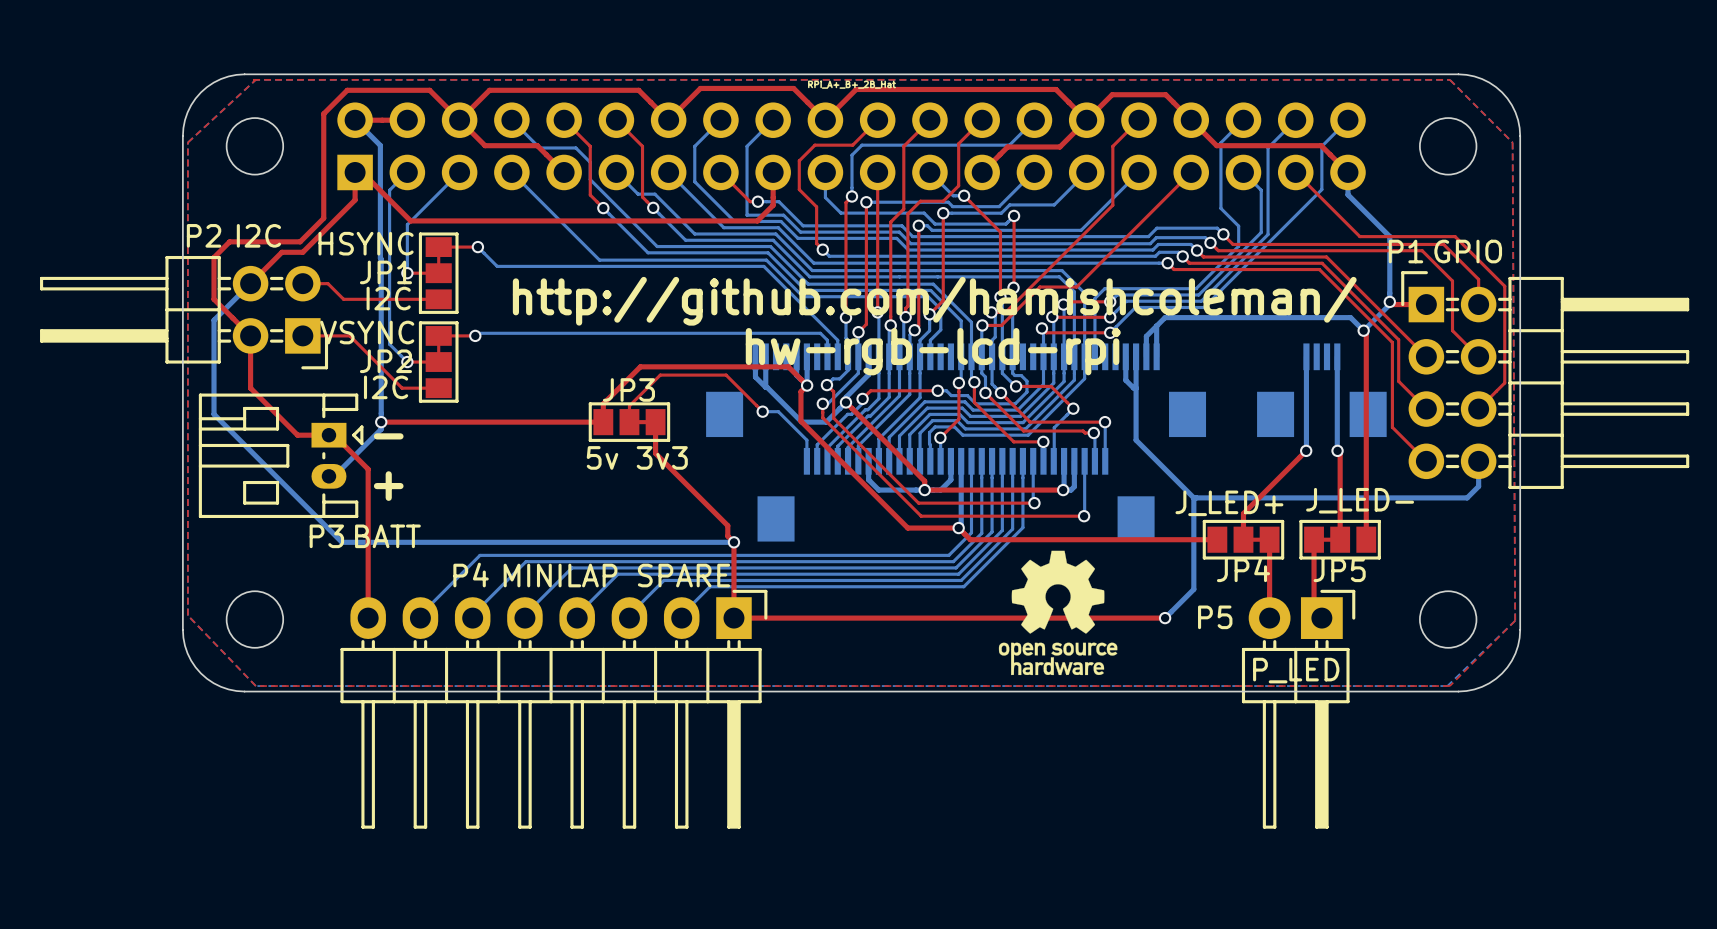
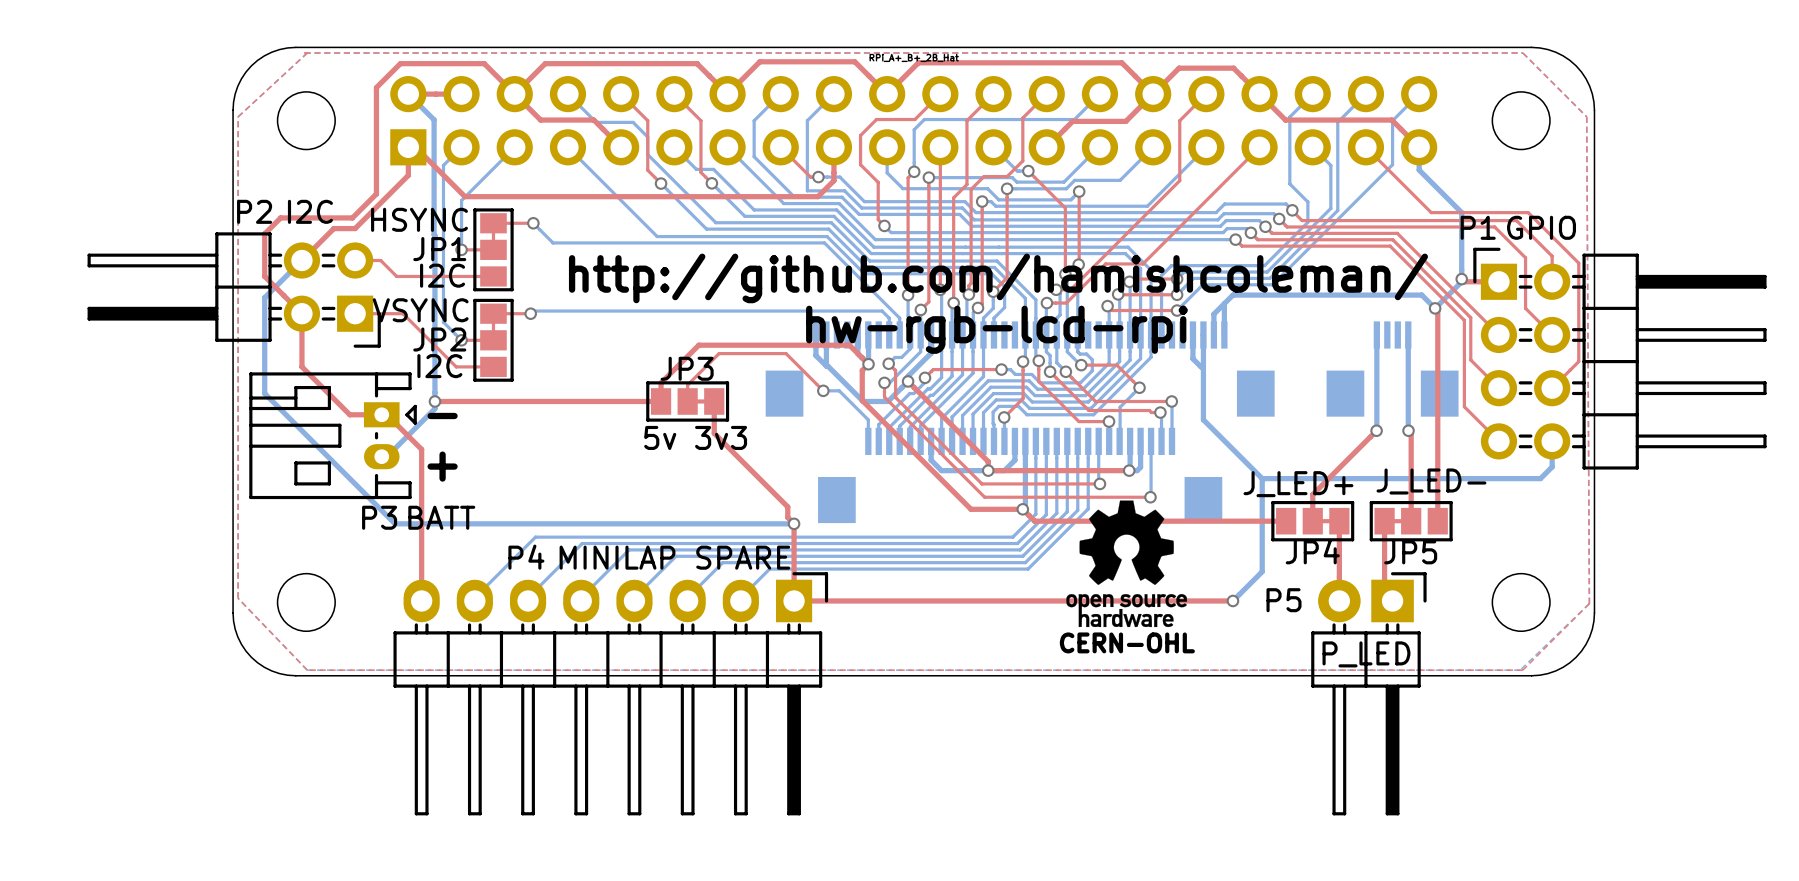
drawing position: (1058, 612) -> (1126, 563)
text: none -> CERN-OHL (1127, 642)

